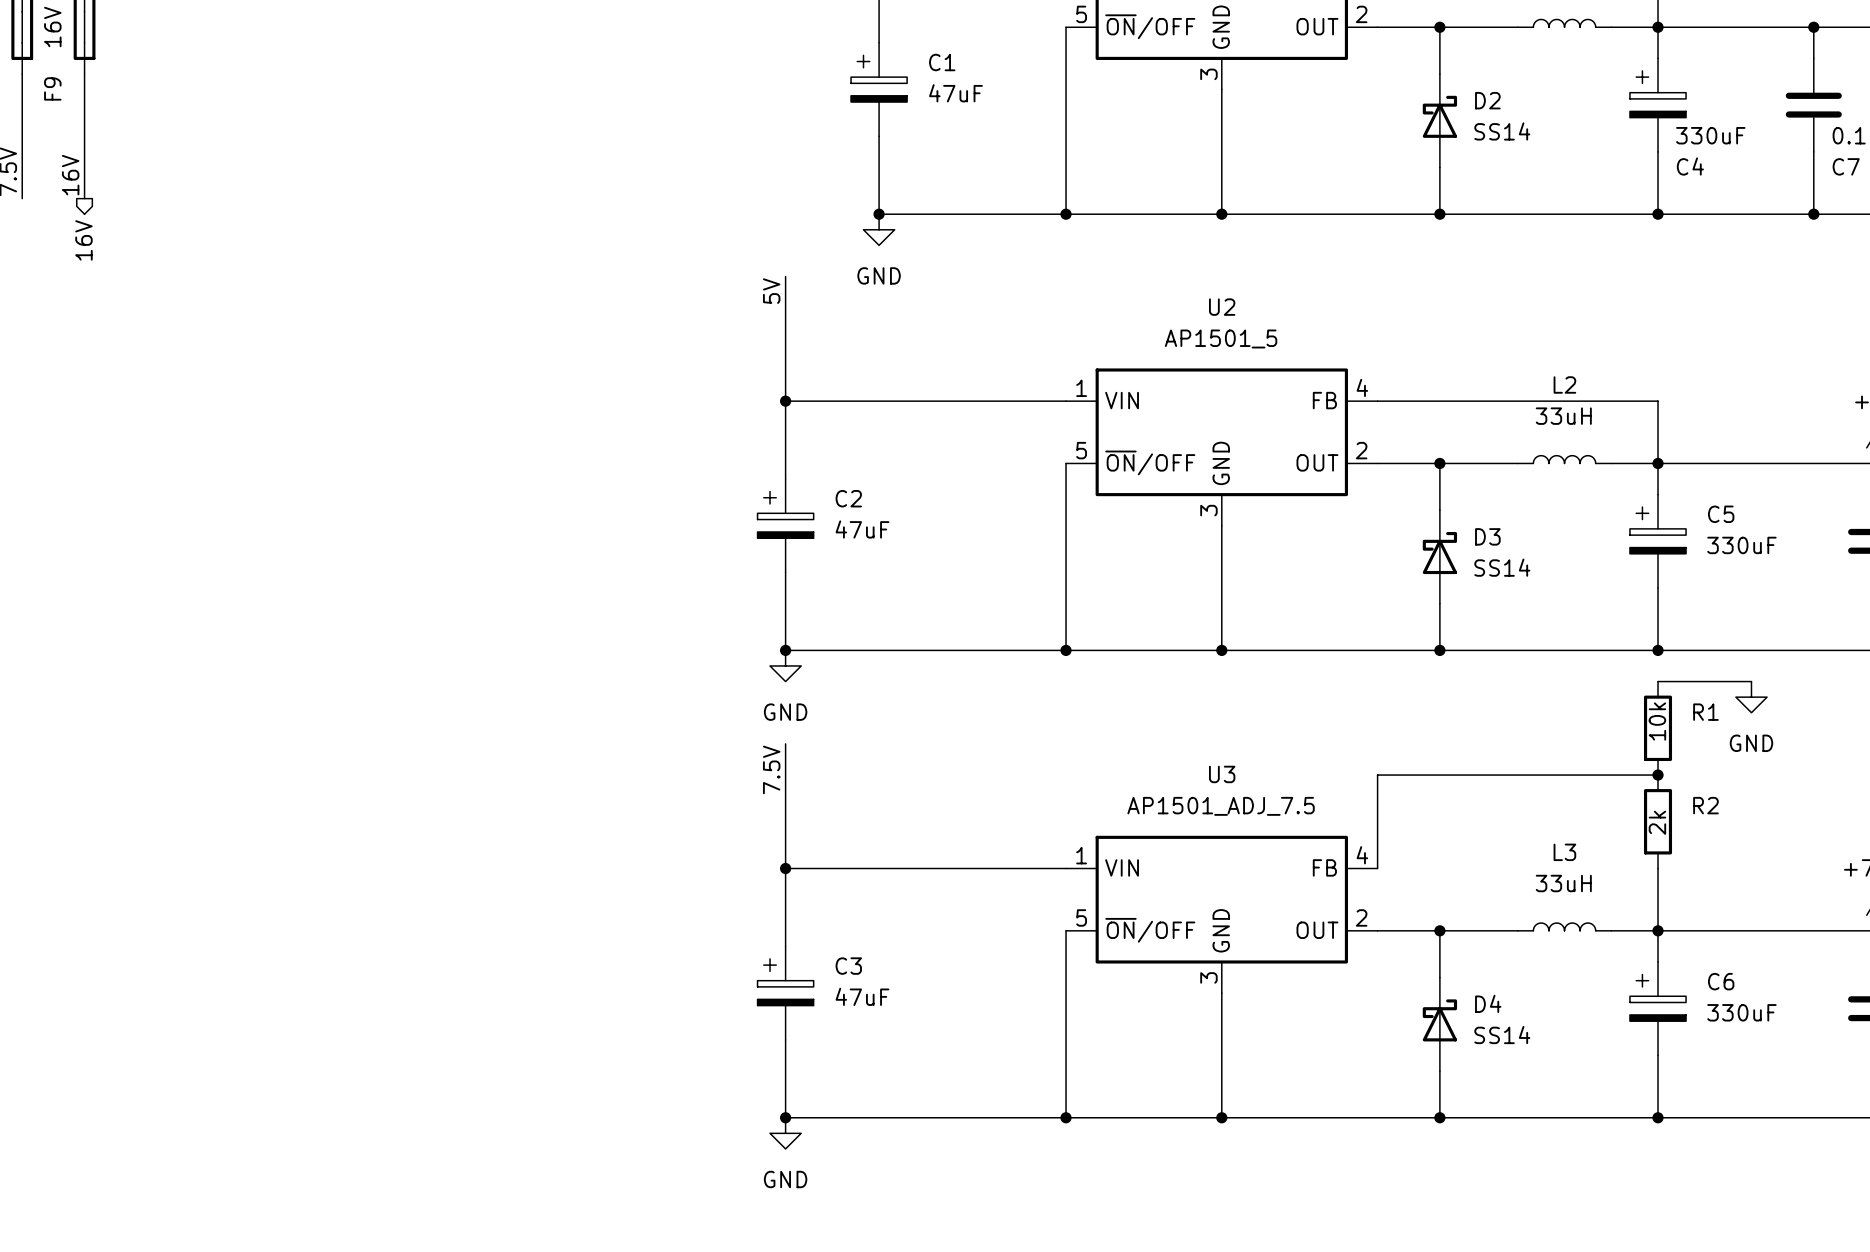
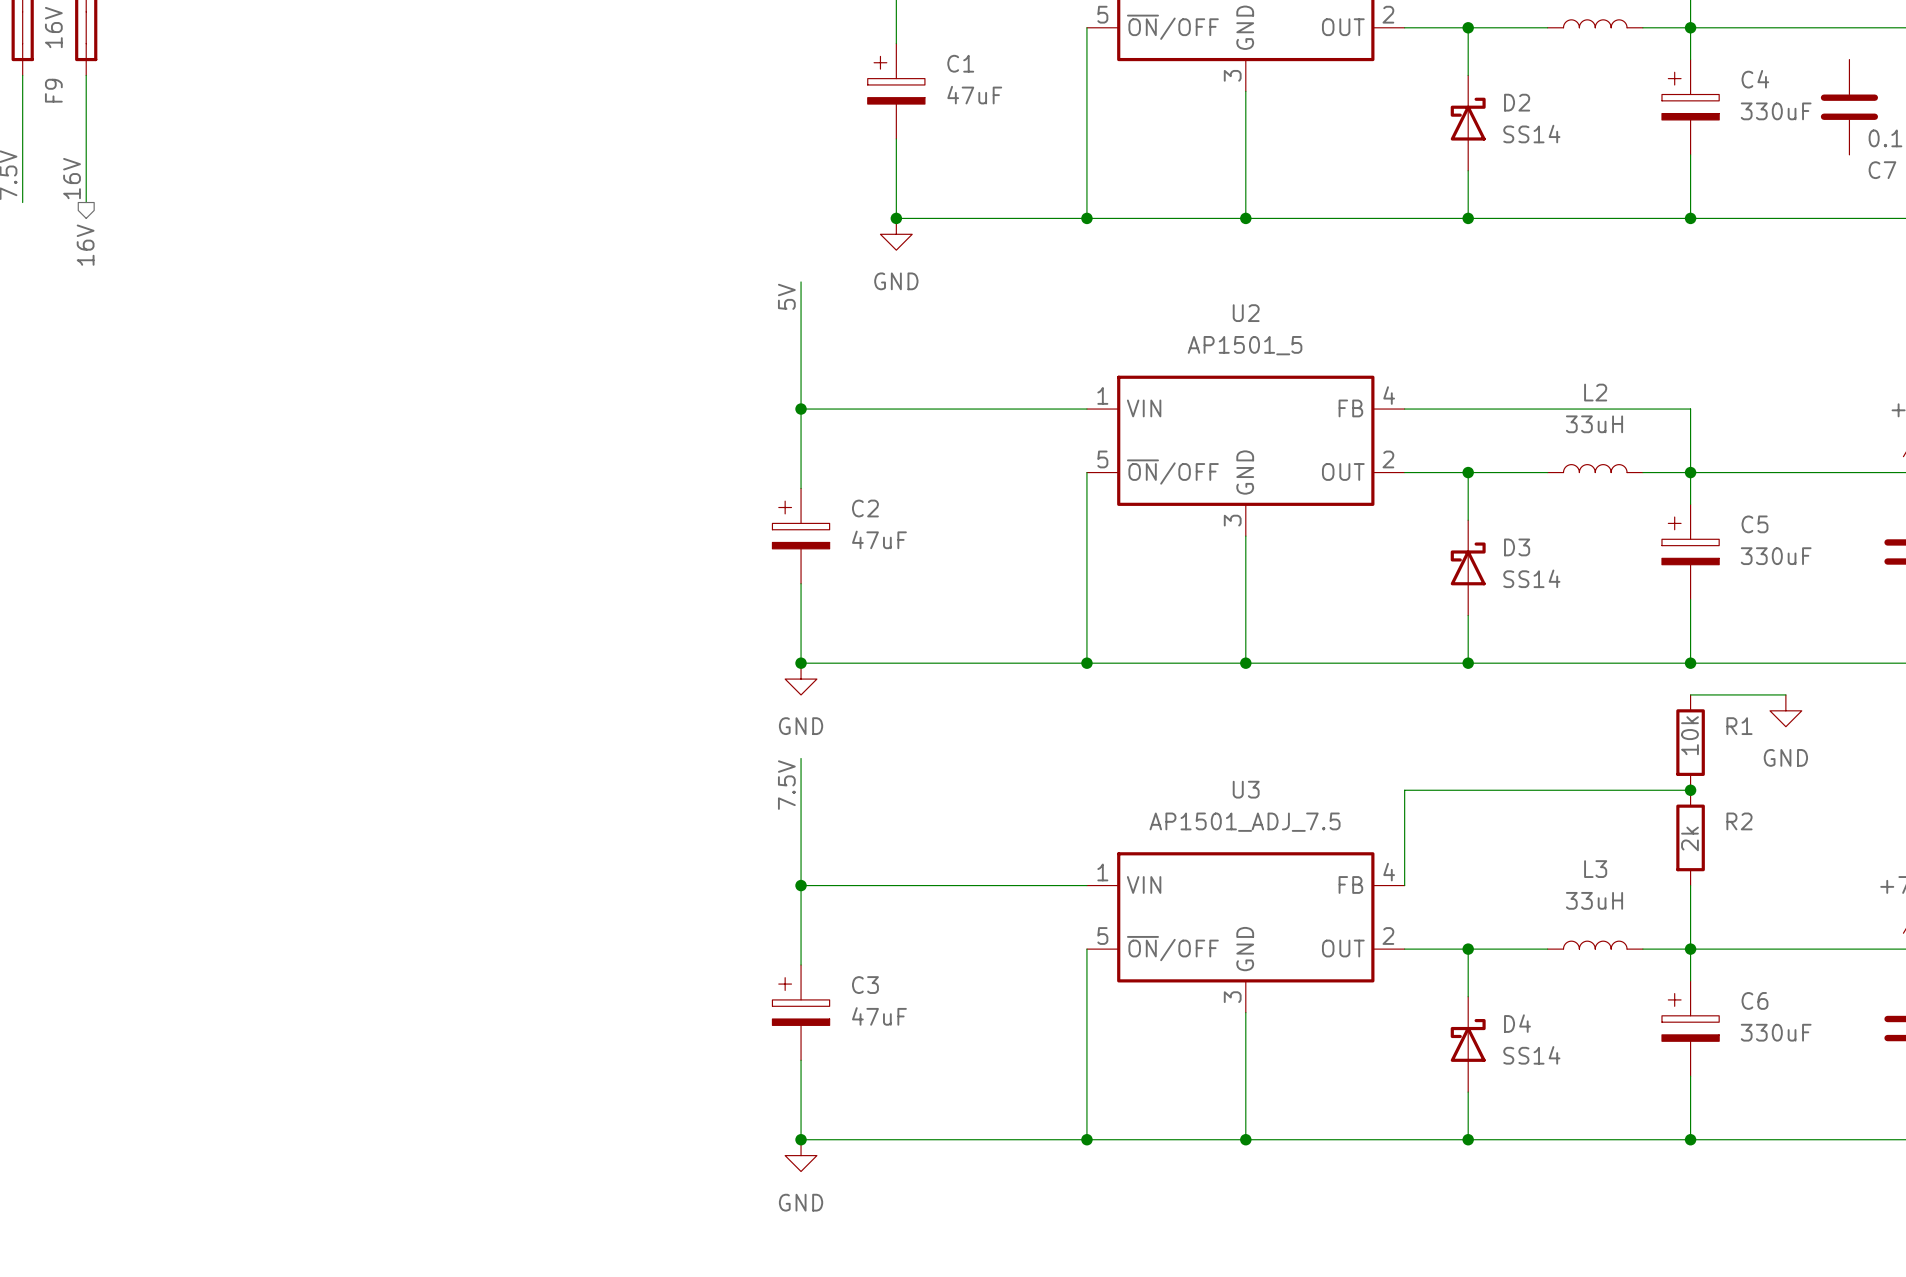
wire: (1813, 27) (1813, 58) -> none
junction: (1813, 27) -> none
C4 value position: 330uF (1710, 135) -> 330uF (1776, 111)
wire: (1813, 151) (1813, 214) -> none
C4 name position: C4 (1690, 166) -> C4 (1755, 79)
junction: (1813, 214) -> none

